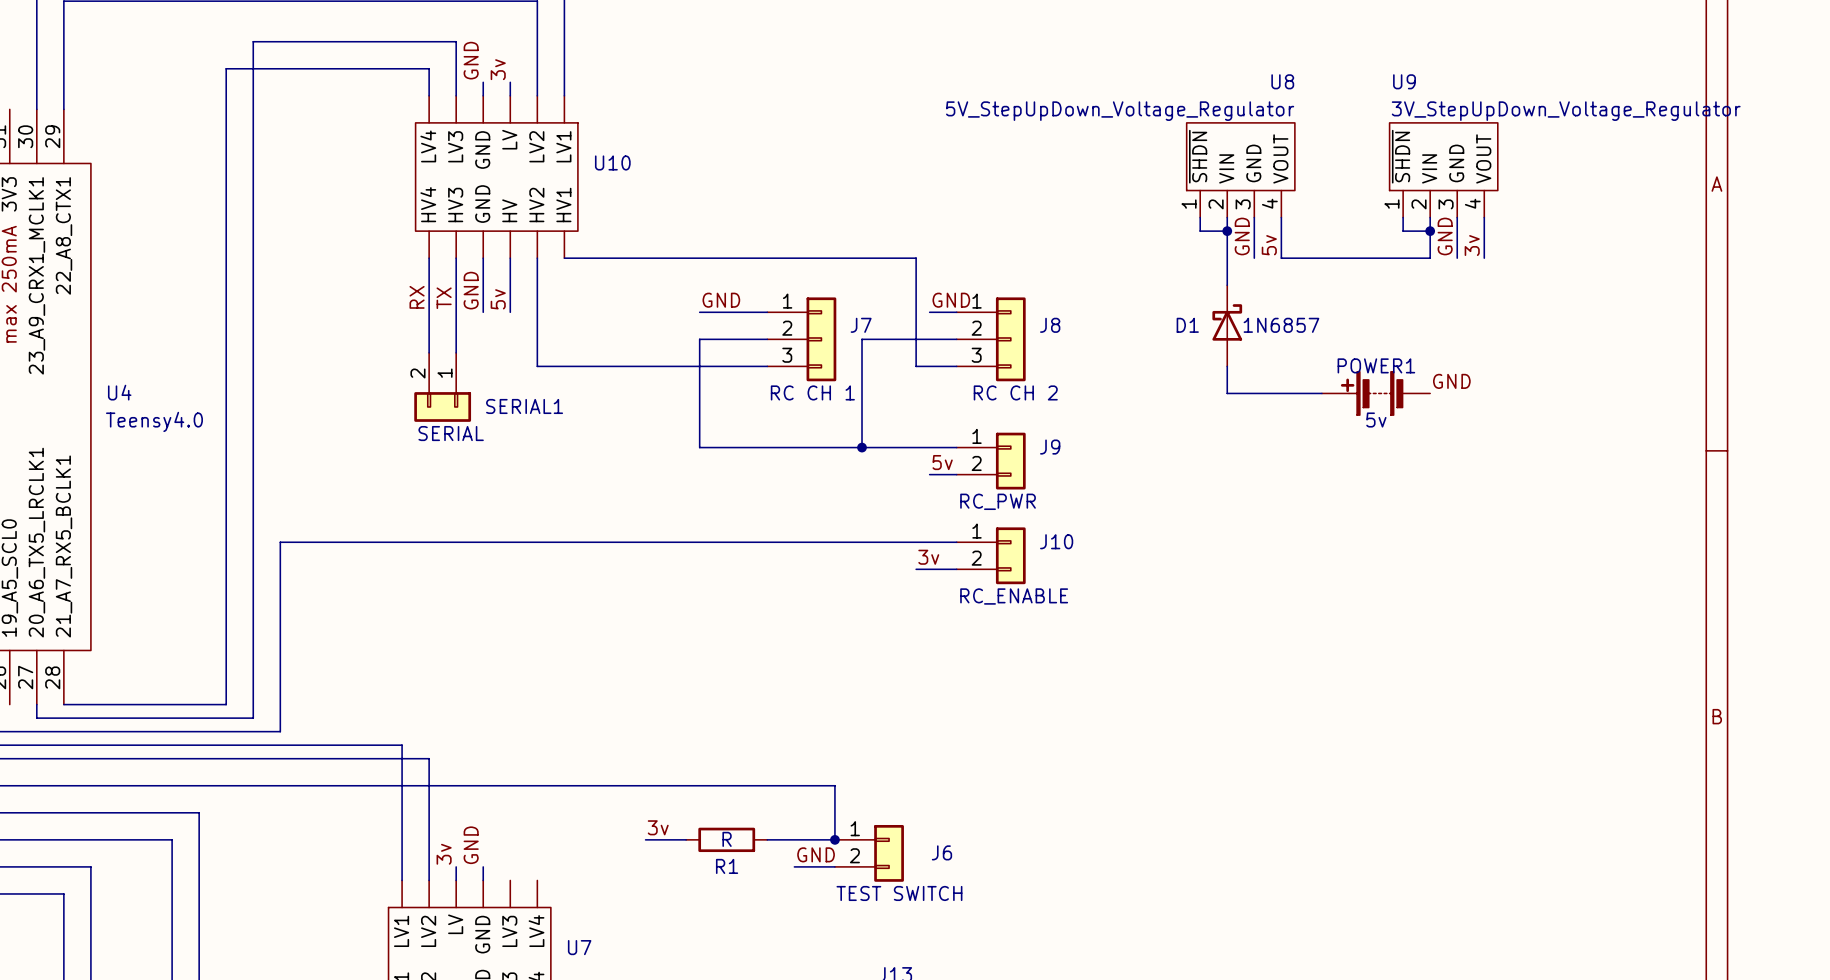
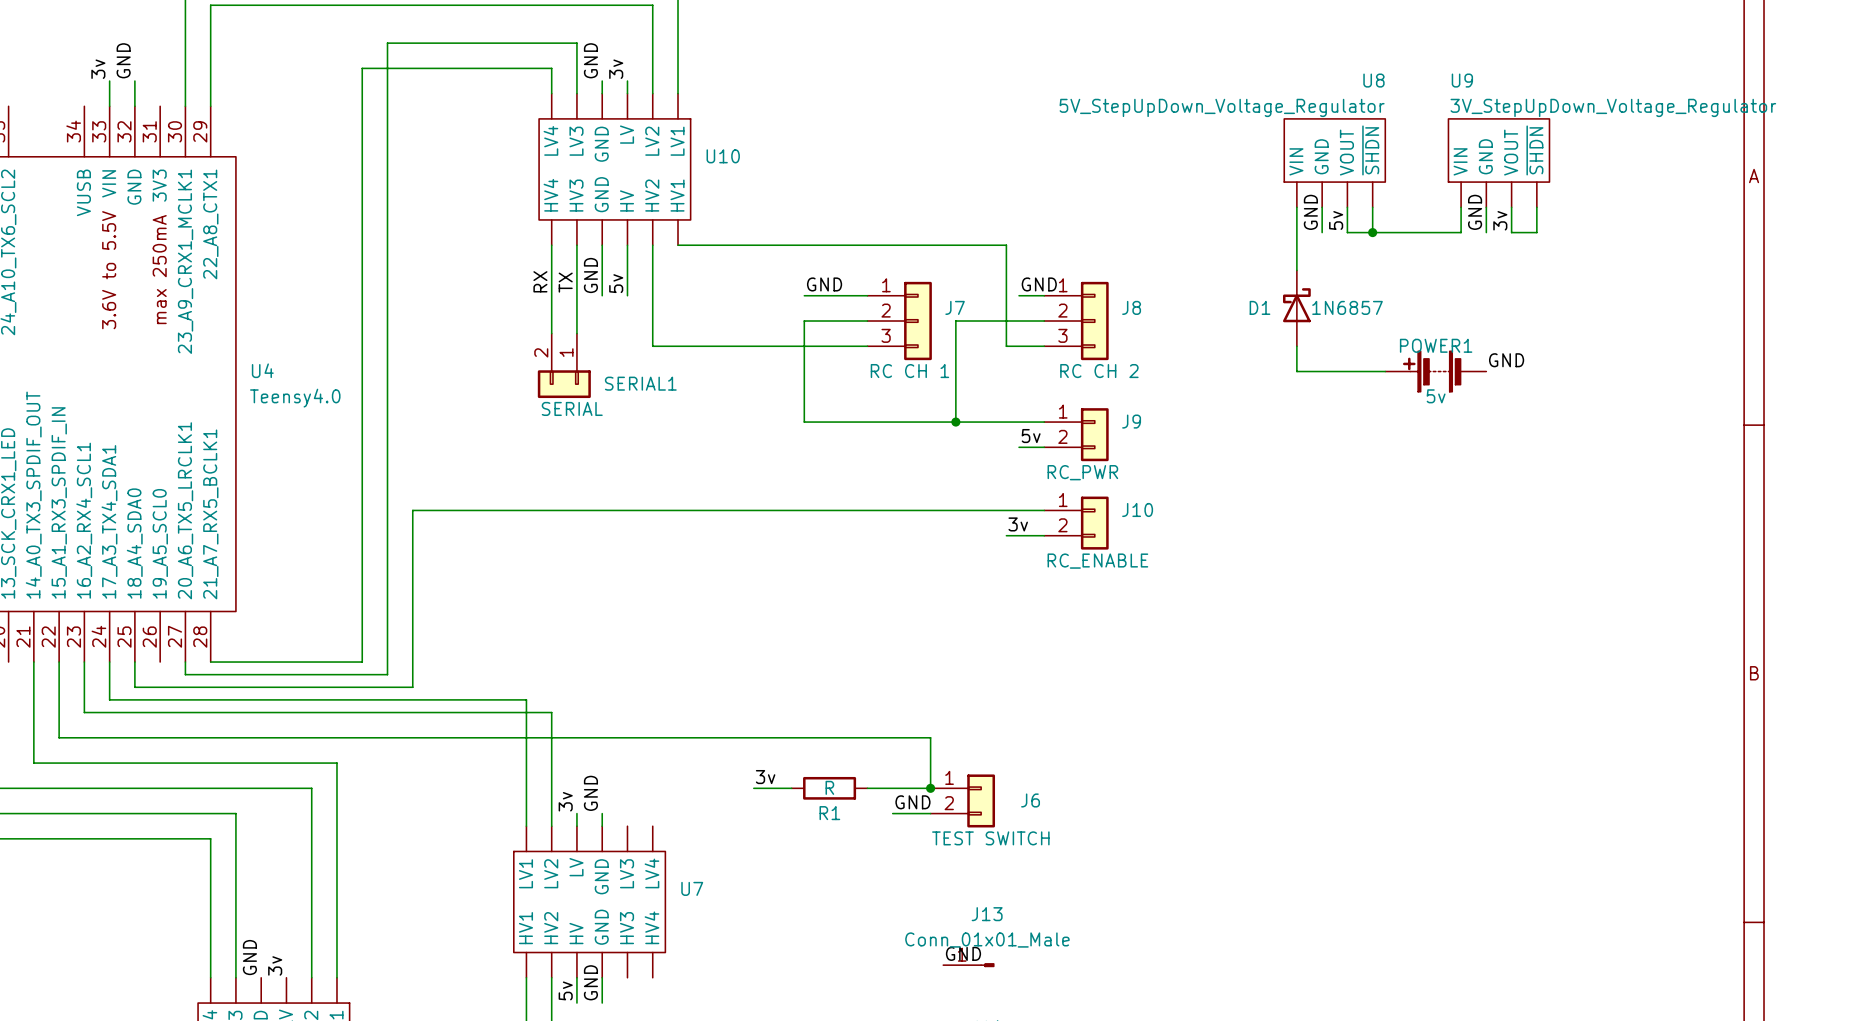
U8 pin name: ~{SHDN} (1198, 156) -> VIN (1296, 161)
U9 pin name: ~{SHDN} (1401, 156) -> VIN (1460, 161)
U8 pin name: VOUT (1280, 158) -> ~{SHDN} (1370, 150)
U9 pin name: VOUT (1483, 158) -> ~{SHDN} (1534, 150)
U9 pin name: GND (1456, 163) -> VOUT (1511, 152)
U9 pin name: VIN (1429, 168) -> GND (1485, 156)
U8 position: (1240, 170) -> (1334, 163)
U8 pin number: 4 (1269, 203) -> none
U9 pin number: 4 (1472, 203) -> none
U8 pin number: 1 (1189, 204) -> none
U8 pin number: 2 (1216, 204) -> none
U8 pin number: 3 (1243, 204) -> none
U9 pin number: 1 (1391, 204) -> none
U9 pin number: 2 (1419, 204) -> none
U9 pin number: 3 (1446, 204) -> none
wire: (1200, 217) (1200, 231) (1227, 231) -> none
wire: none -> (1372, 207) (1372, 232)
junction: (1227, 231) -> none
wire: (1403, 231) (1430, 231) -> none
junction: (1430, 231) -> none
label position: GND (1242, 236) -> GND (1310, 212)
label position: GND (1445, 236) -> GND (1475, 212)
wire: (1254, 244) (1254, 258) -> none
wire: (1281, 244) (1281, 258) (1430, 258) (1430, 244) -> (1347, 232) (1461, 232) (1461, 219)
junction: none -> (1372, 232)
wire: (1457, 244) (1457, 258) -> (1511, 232) (1536, 232)
wire: (1484, 244) (1484, 258) -> none
label position: 5v (1269, 245) -> 5v (1336, 220)
label position: 3v (1472, 245) -> 3v (1500, 220)

